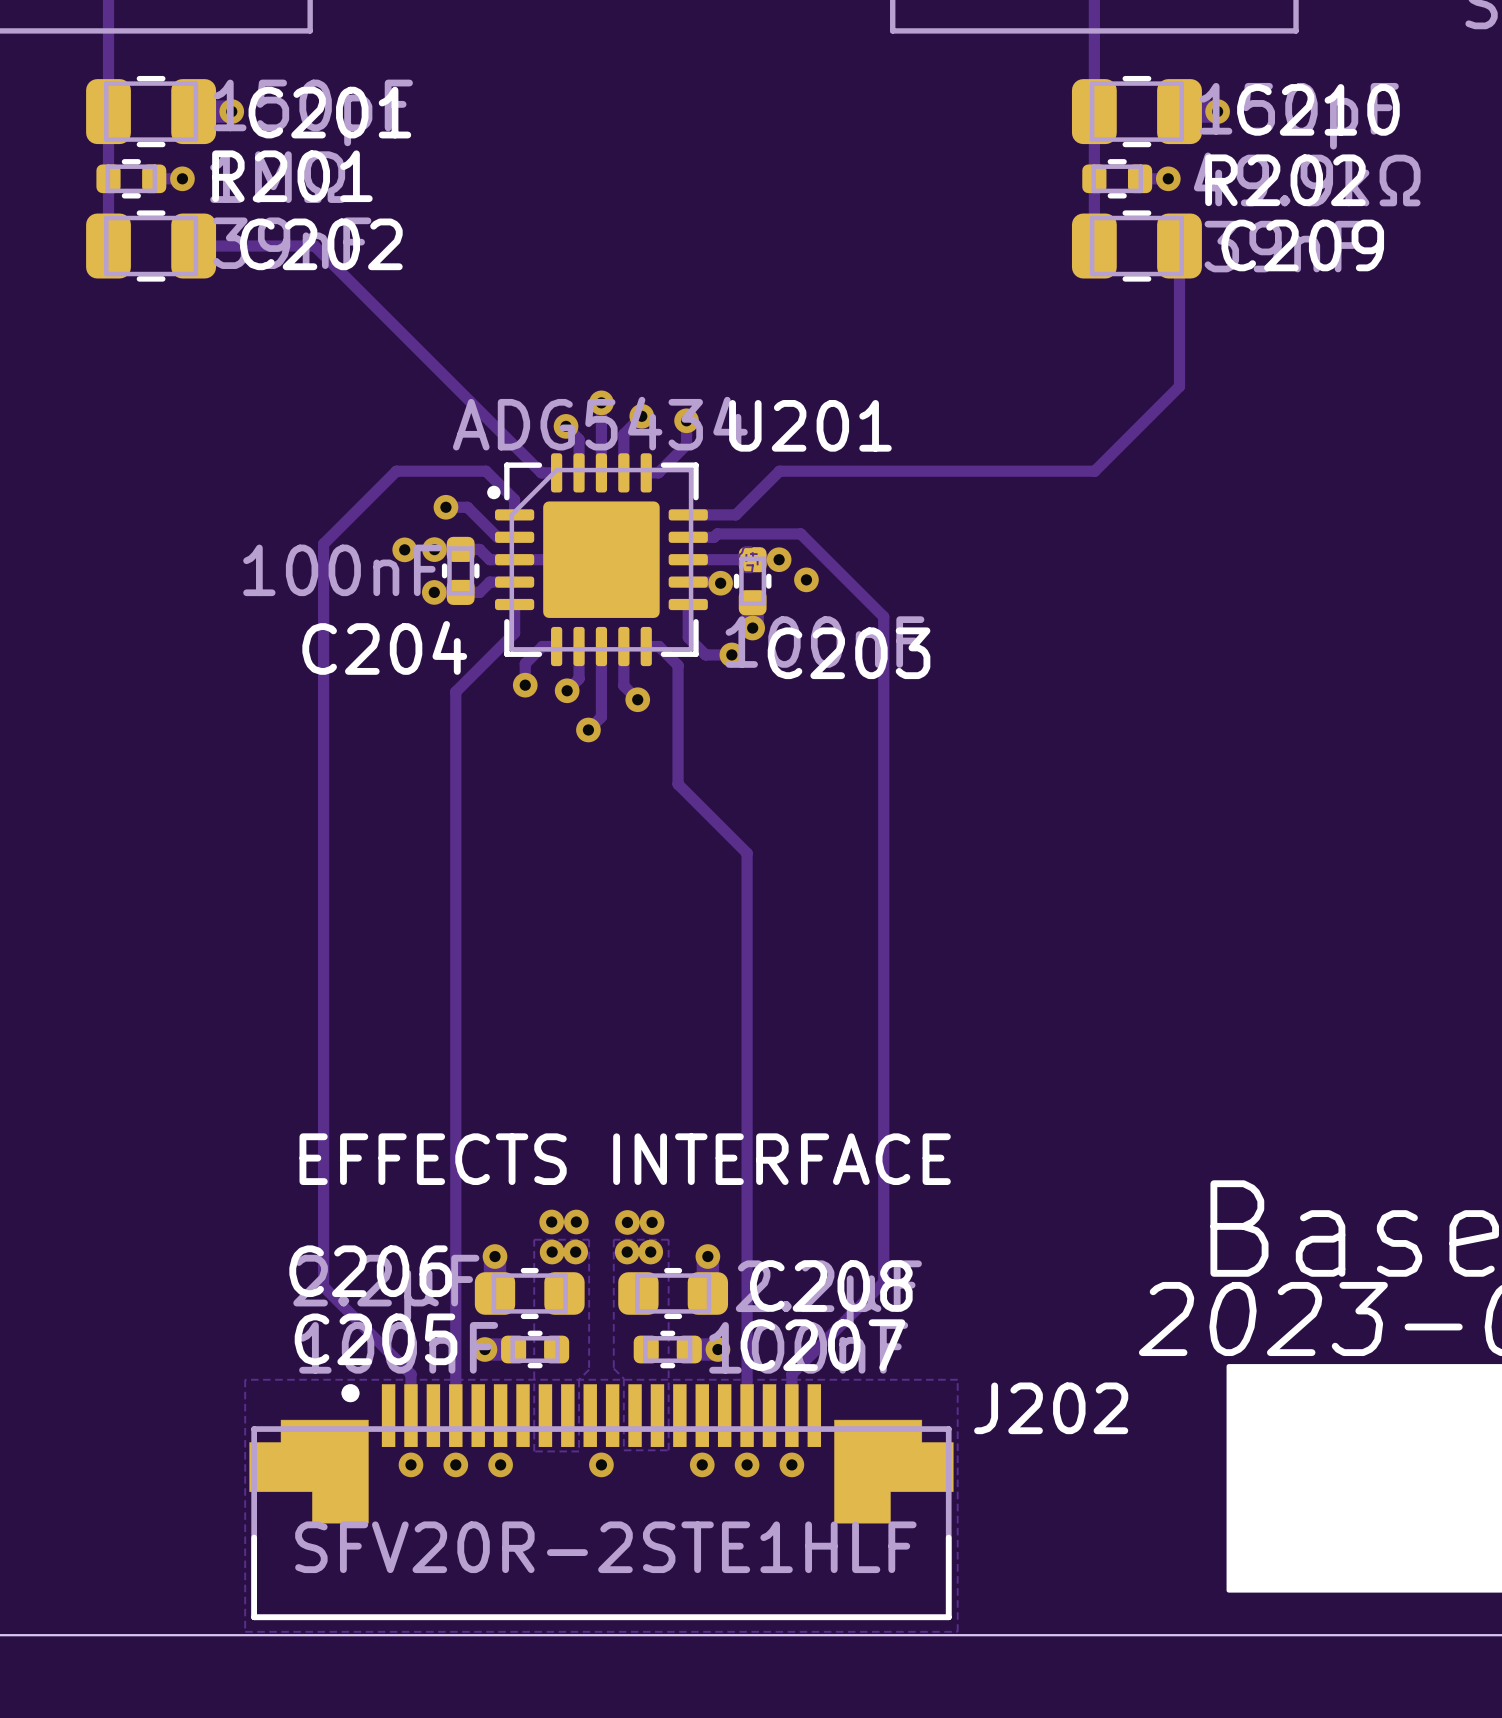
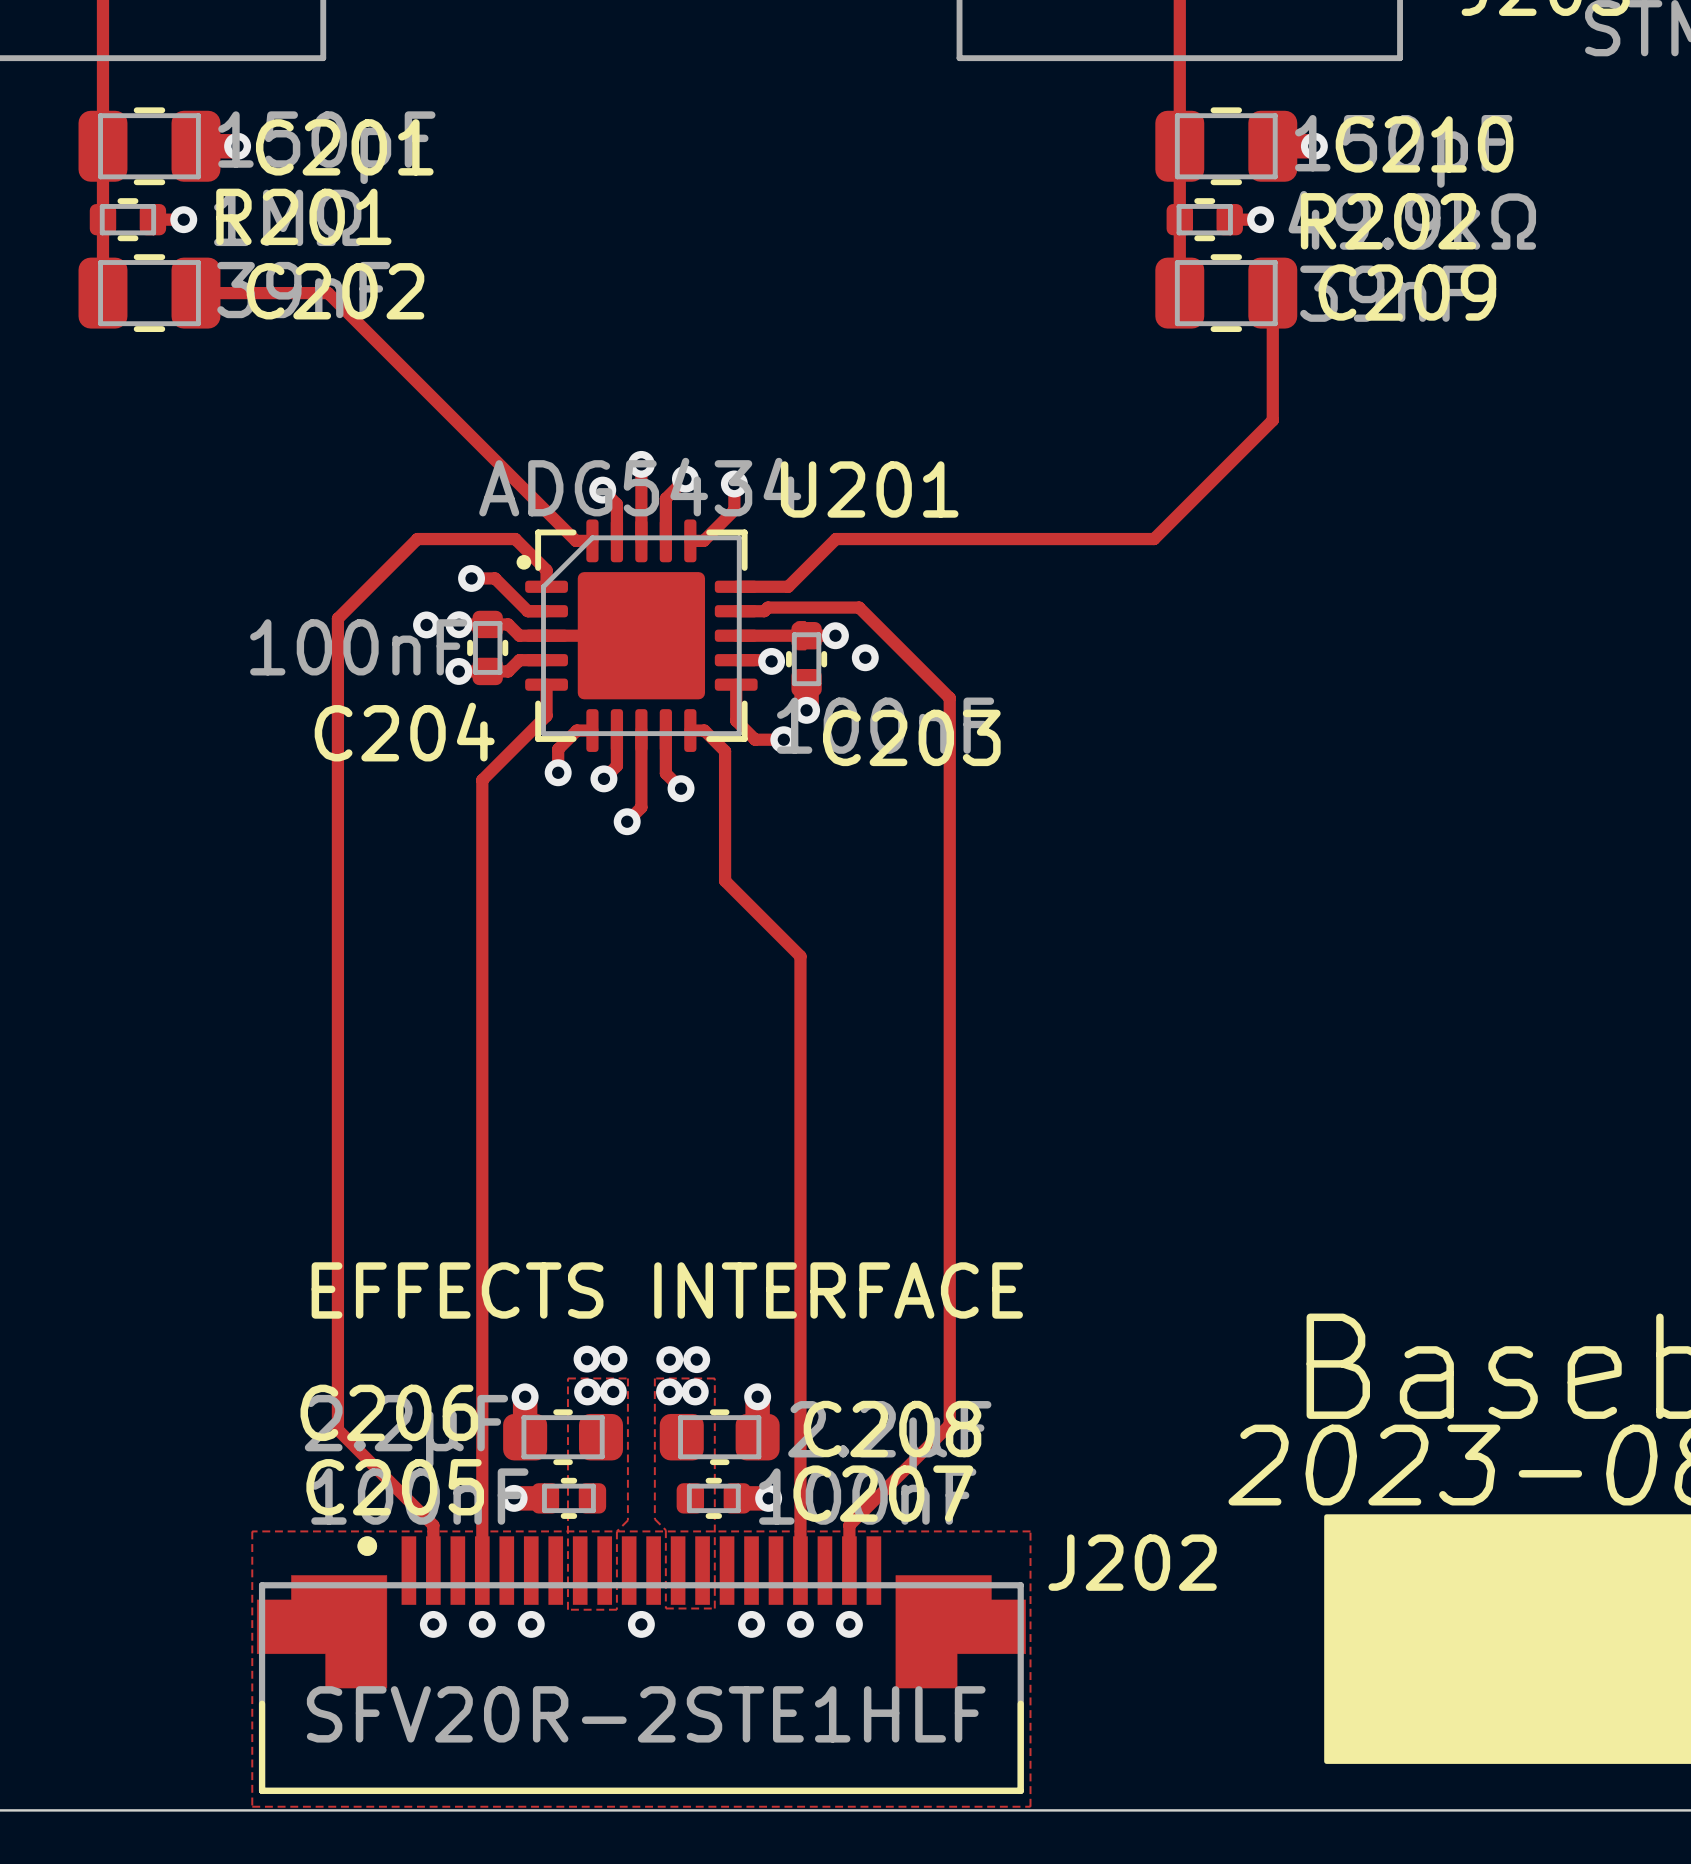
track: (1179, 362) (1179, 386) (1094, 471) (1070, 471) -> (1272, 420) (1154, 539)

